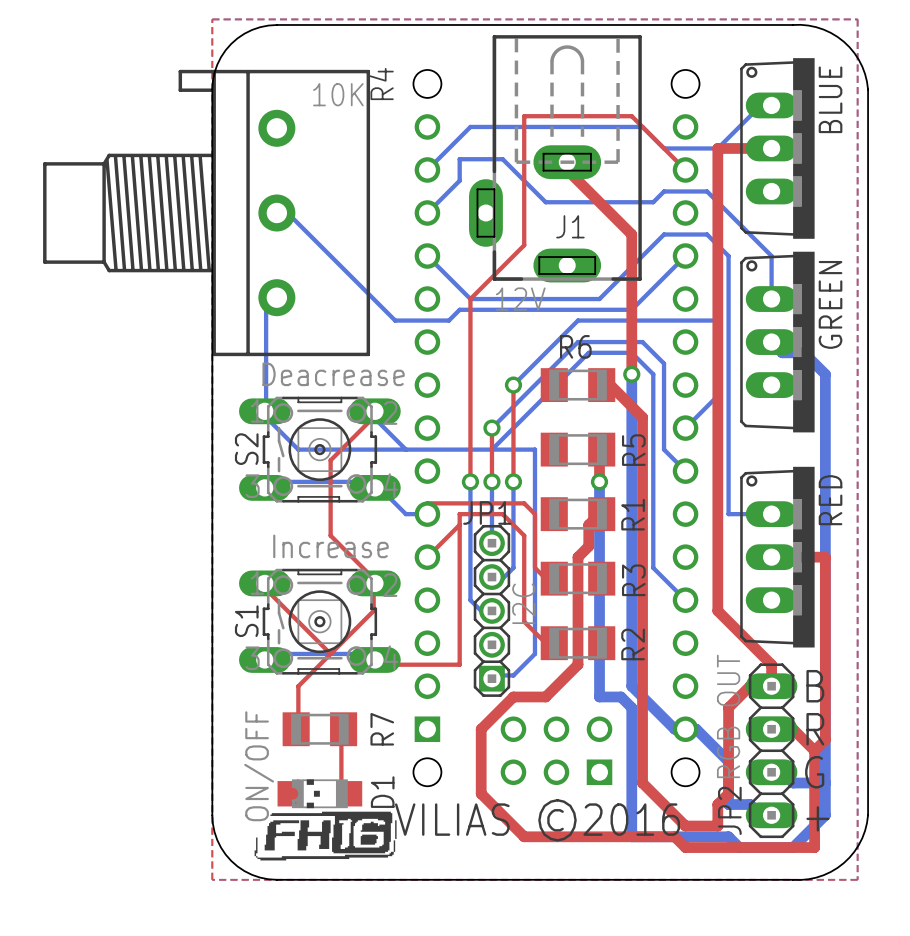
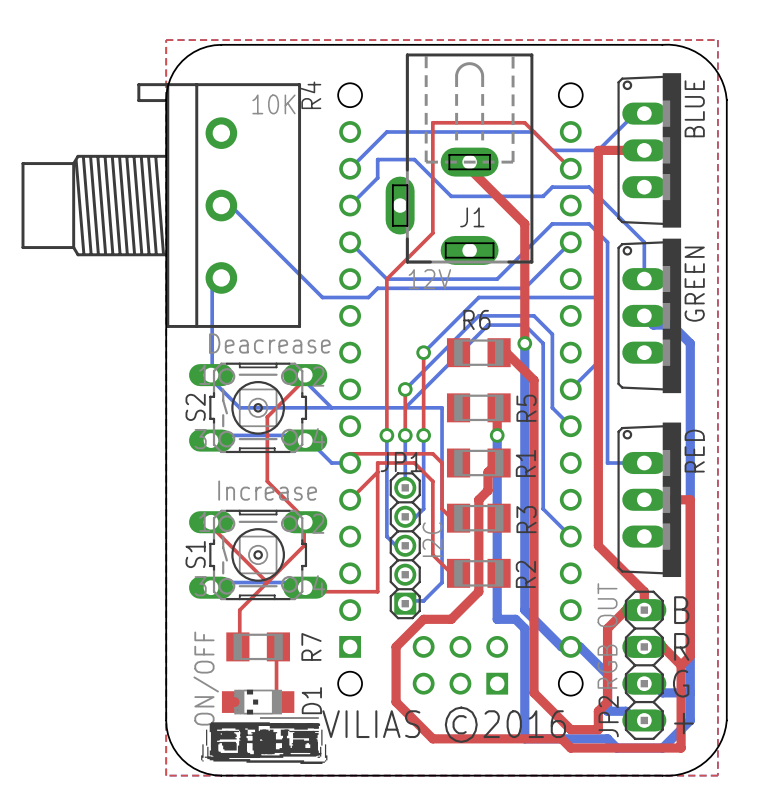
drawing: [254, 813, 397, 858] -> none
drawing: none -> [201, 722, 328, 764]

